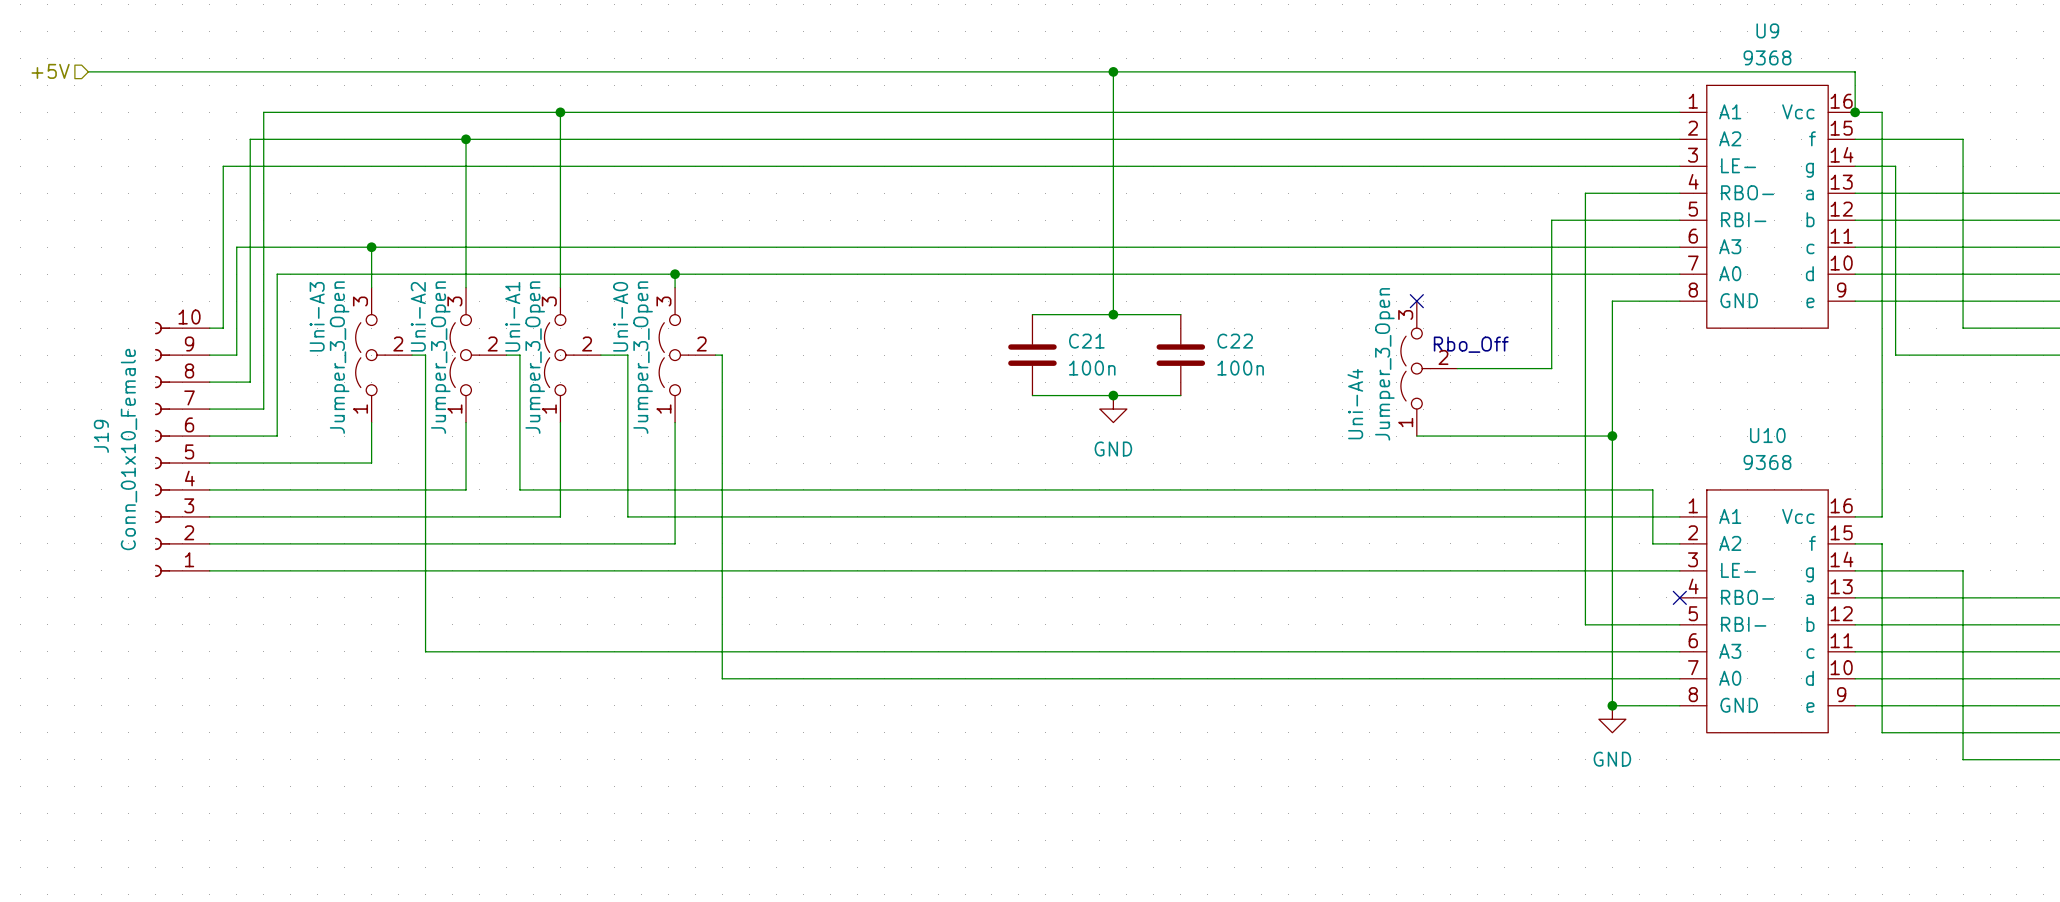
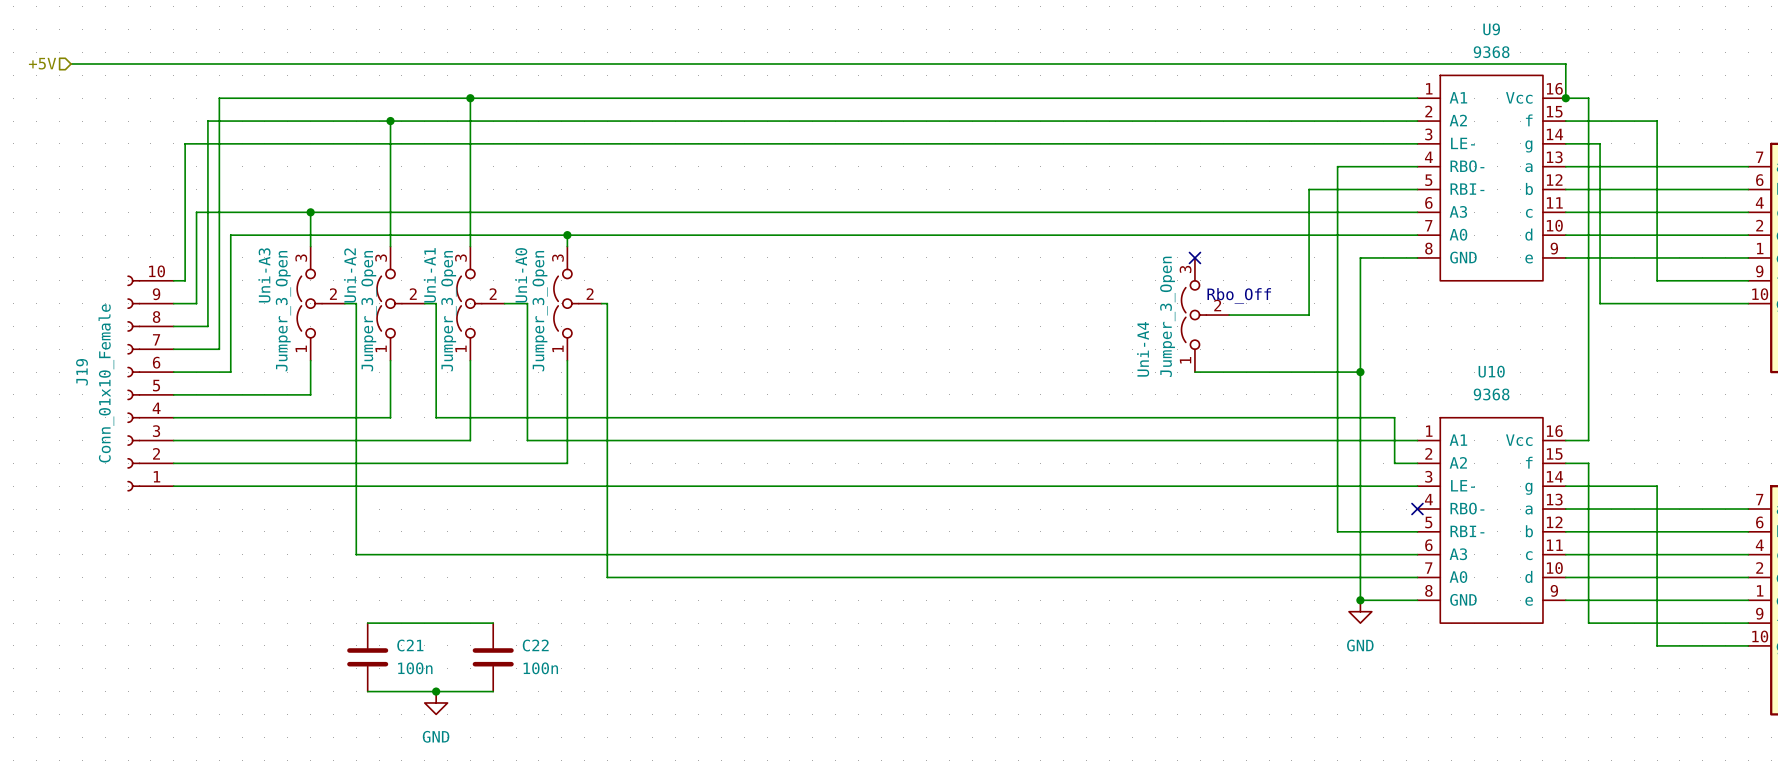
wire: (1113, 71) (1113, 314) -> none
junction: (1113, 71) -> none
wire: (1032, 314) (1180, 314) -> none
junction: (1113, 314) -> none
C21 position: (1032, 355) -> (367, 657)
C22 position: (1180, 355) -> (493, 657)
wire: (1032, 395) (1180, 395) -> none
junction: (1113, 395) -> none
power symbol: GND (1113, 409) -> none
wire: none -> (367, 623) (493, 623)
wire: none -> (367, 691) (493, 691)
junction: none -> (436, 691)
power symbol: none -> GND (436, 702)

